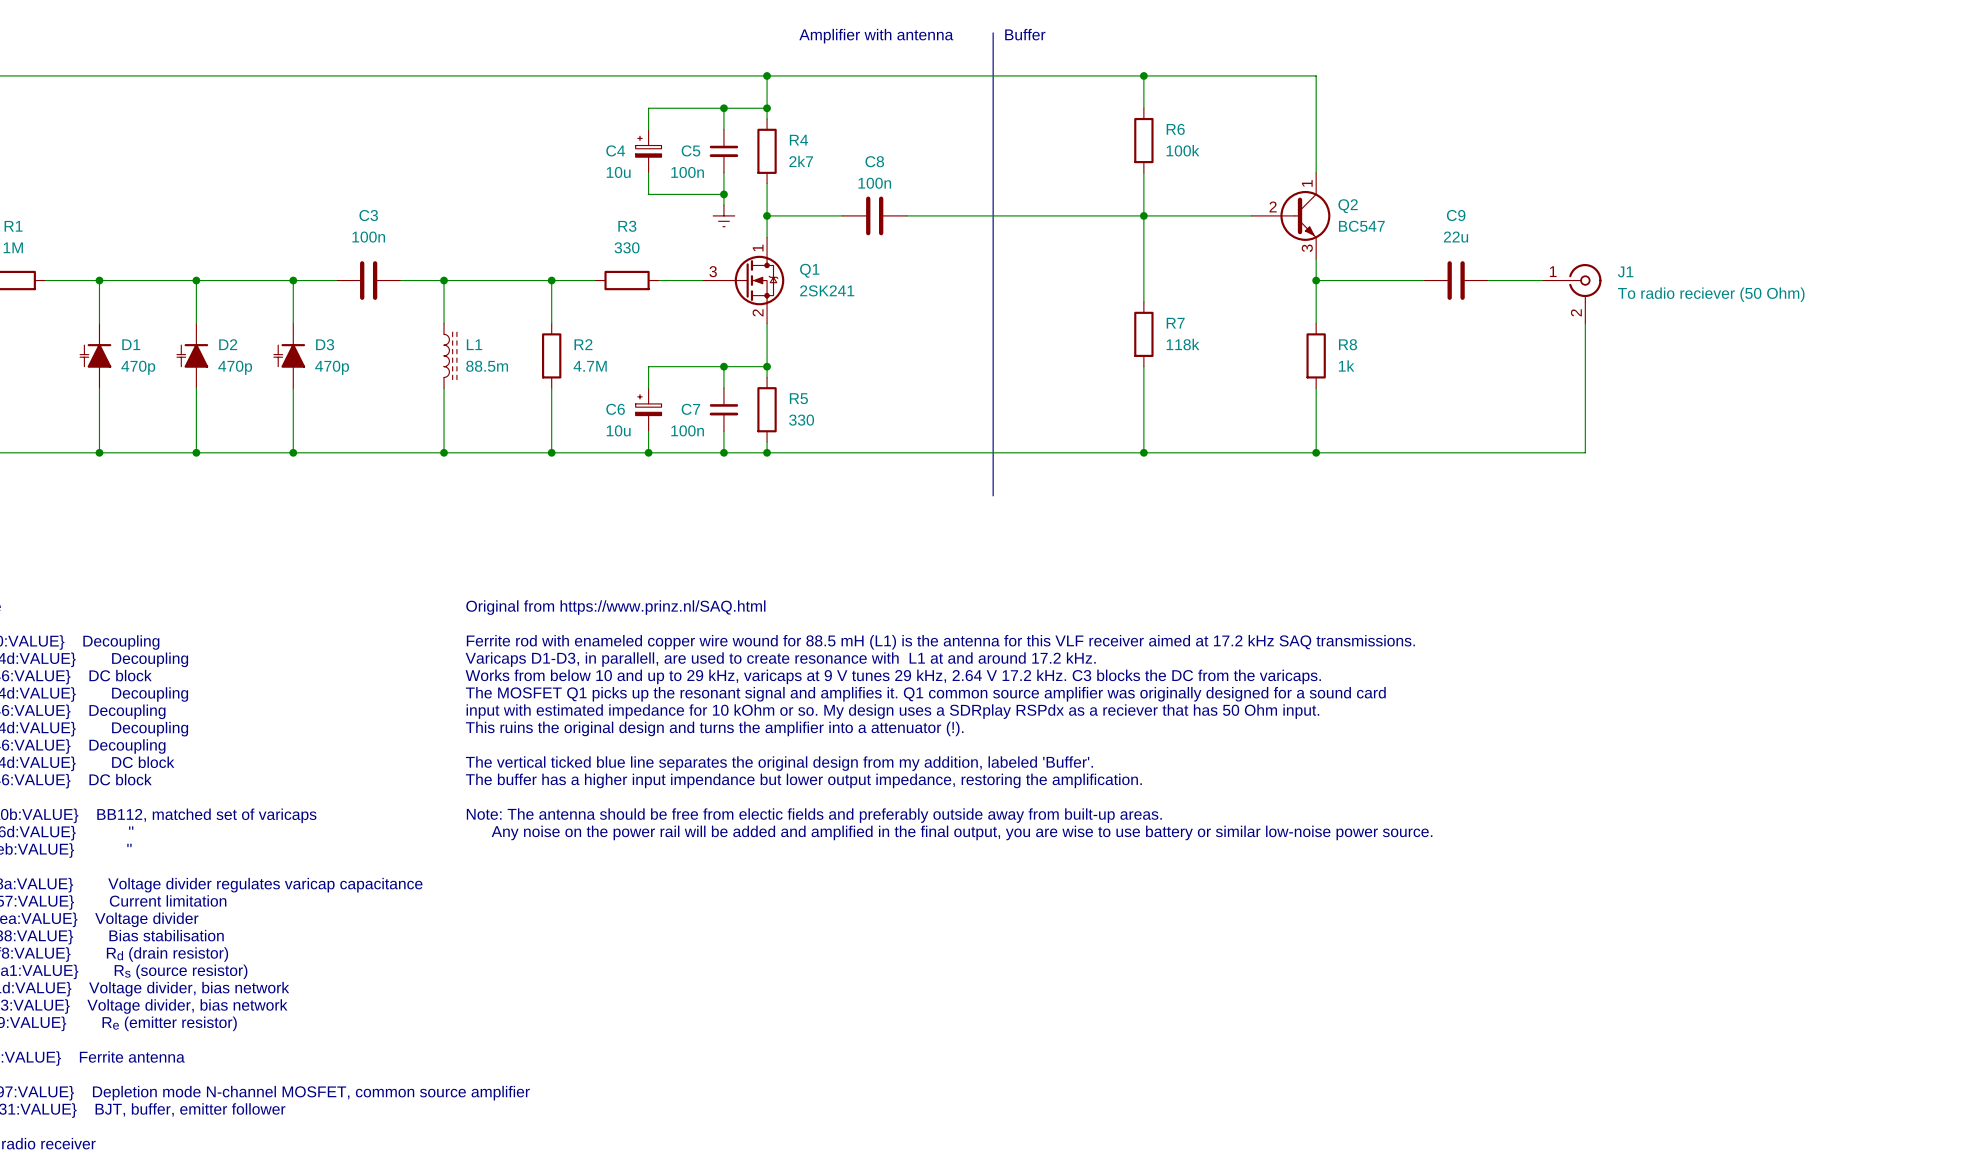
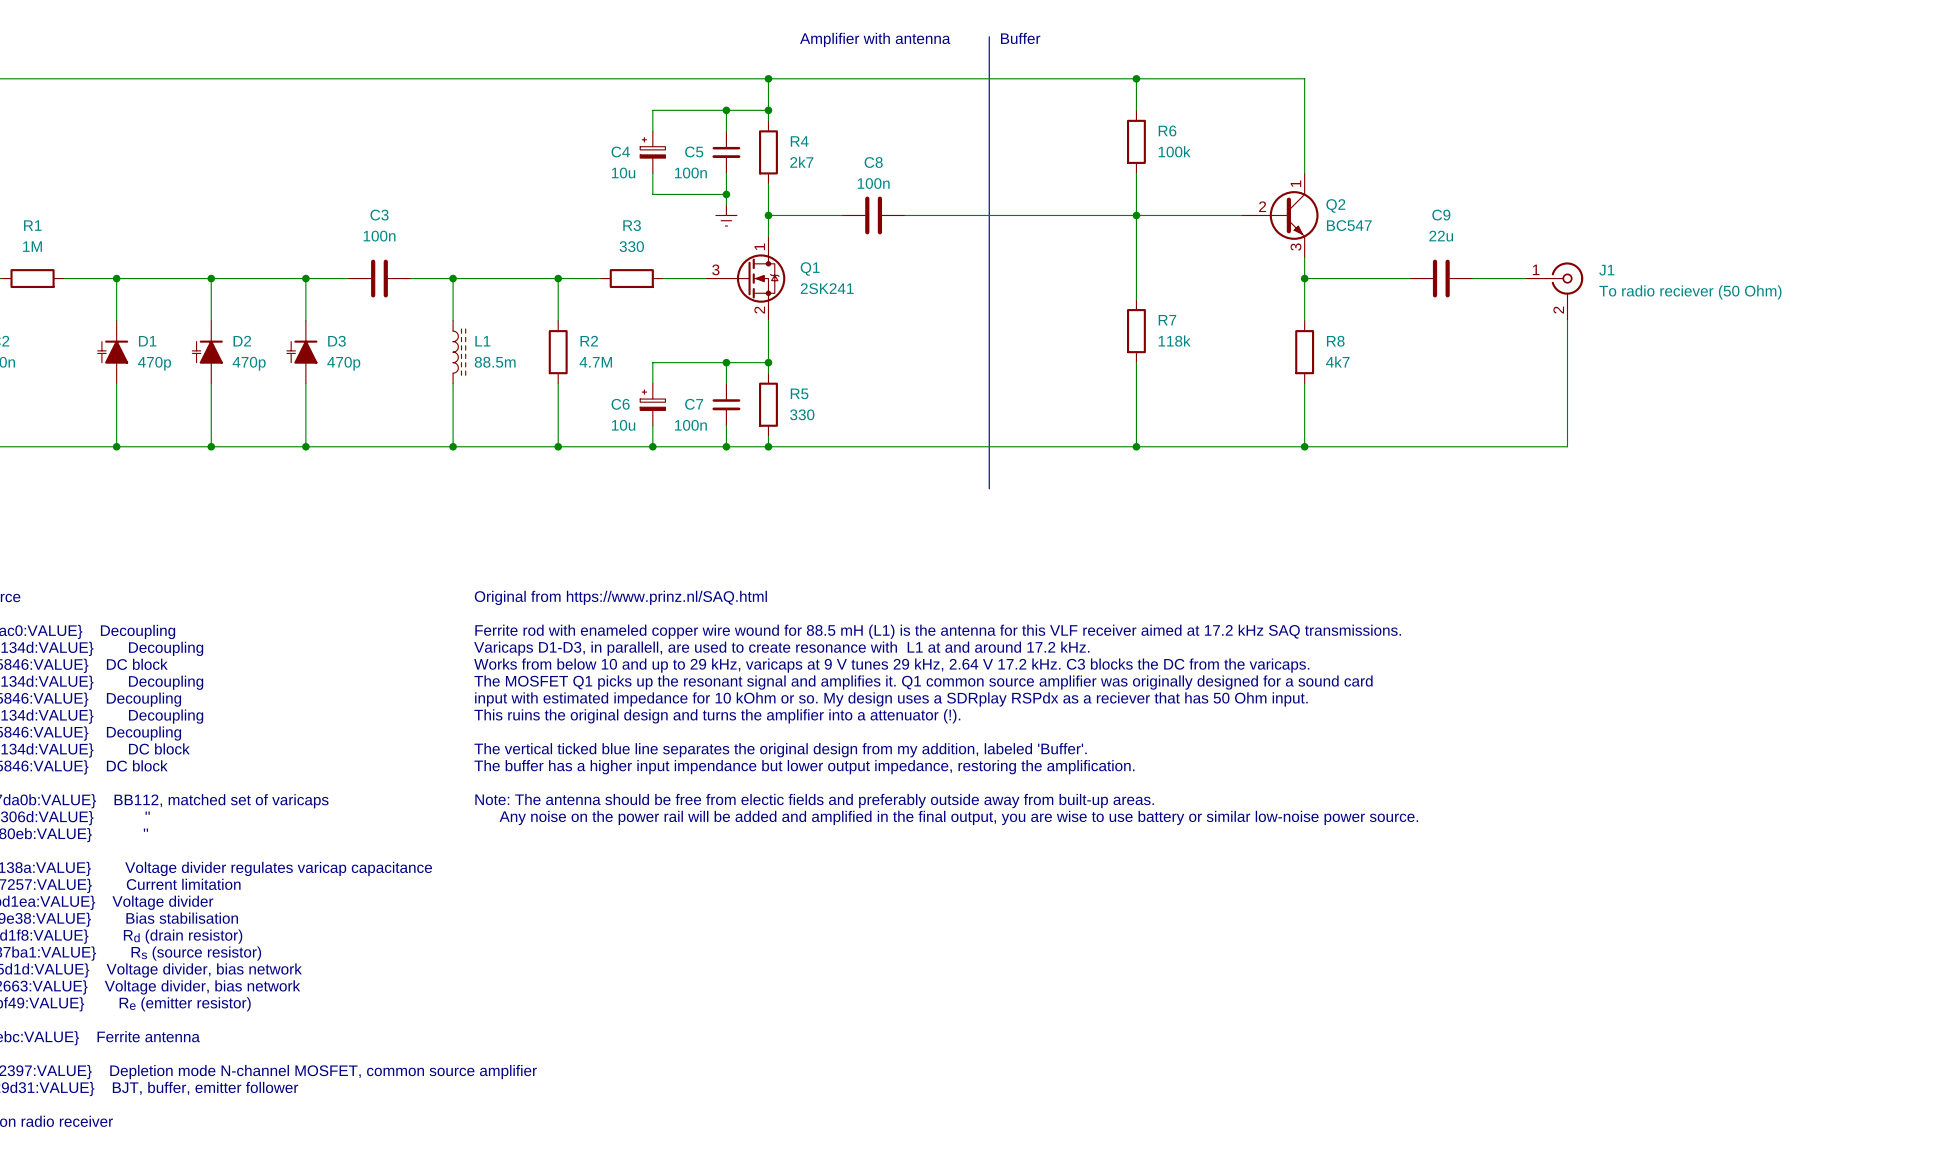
R8 value: 1k (1346, 365) -> 4k7 (1337, 361)

